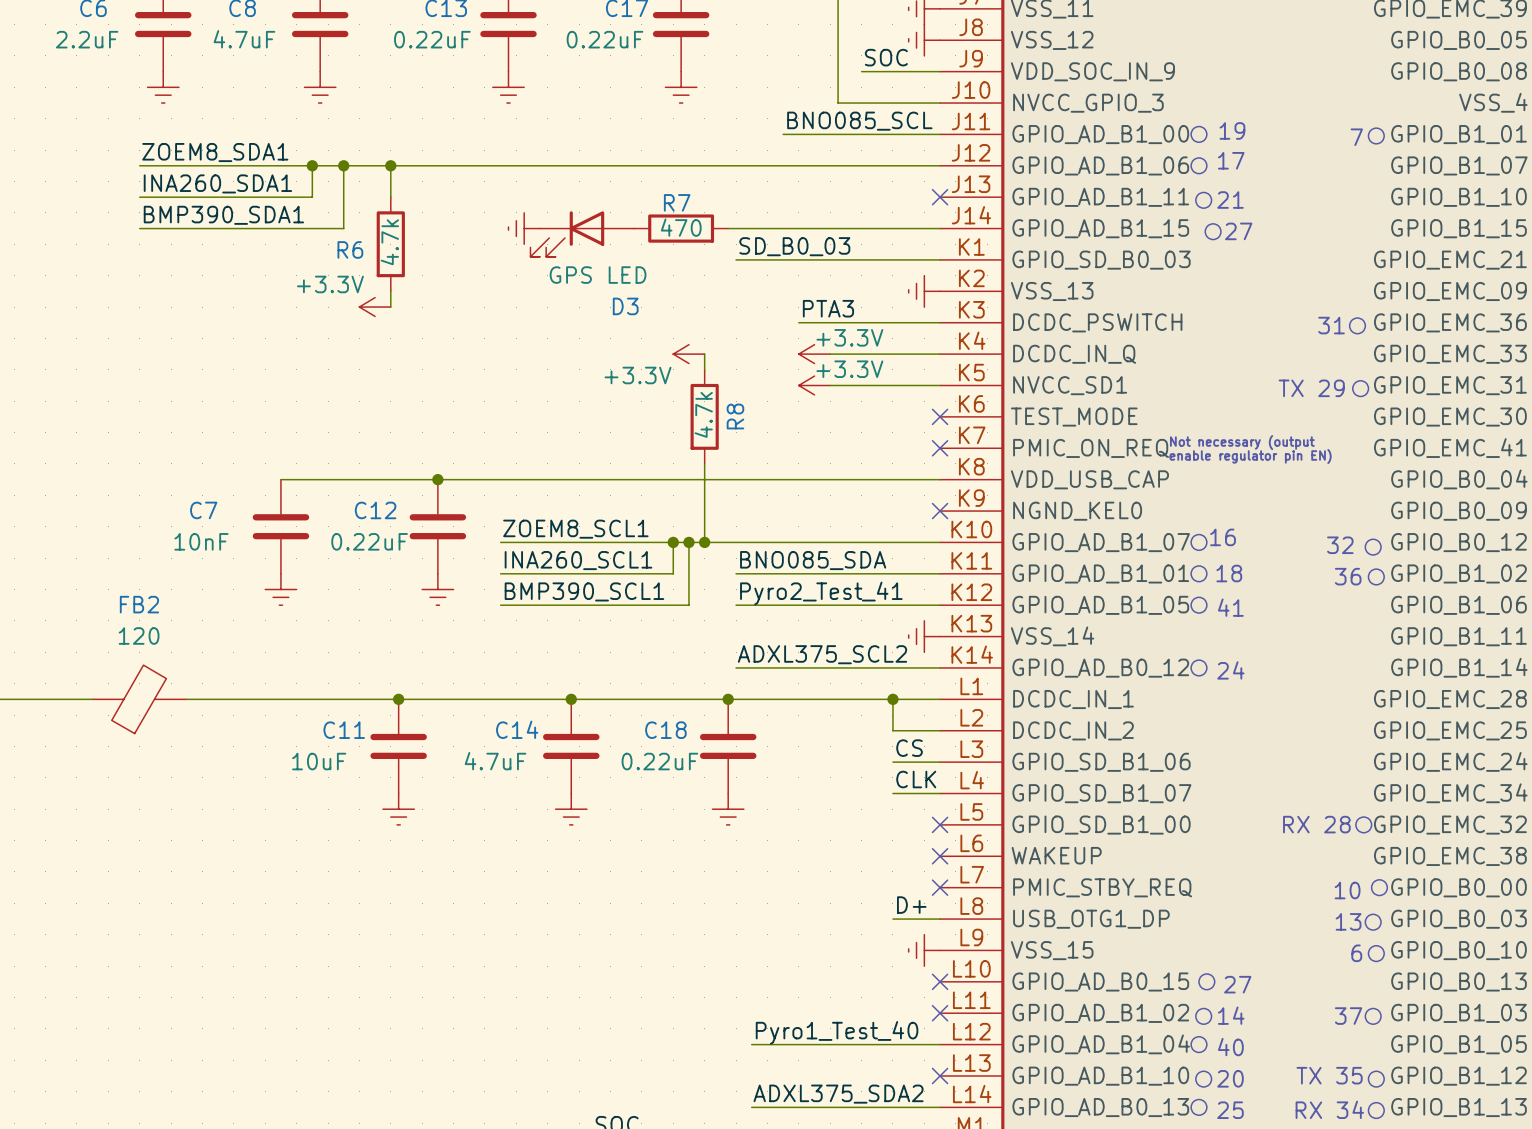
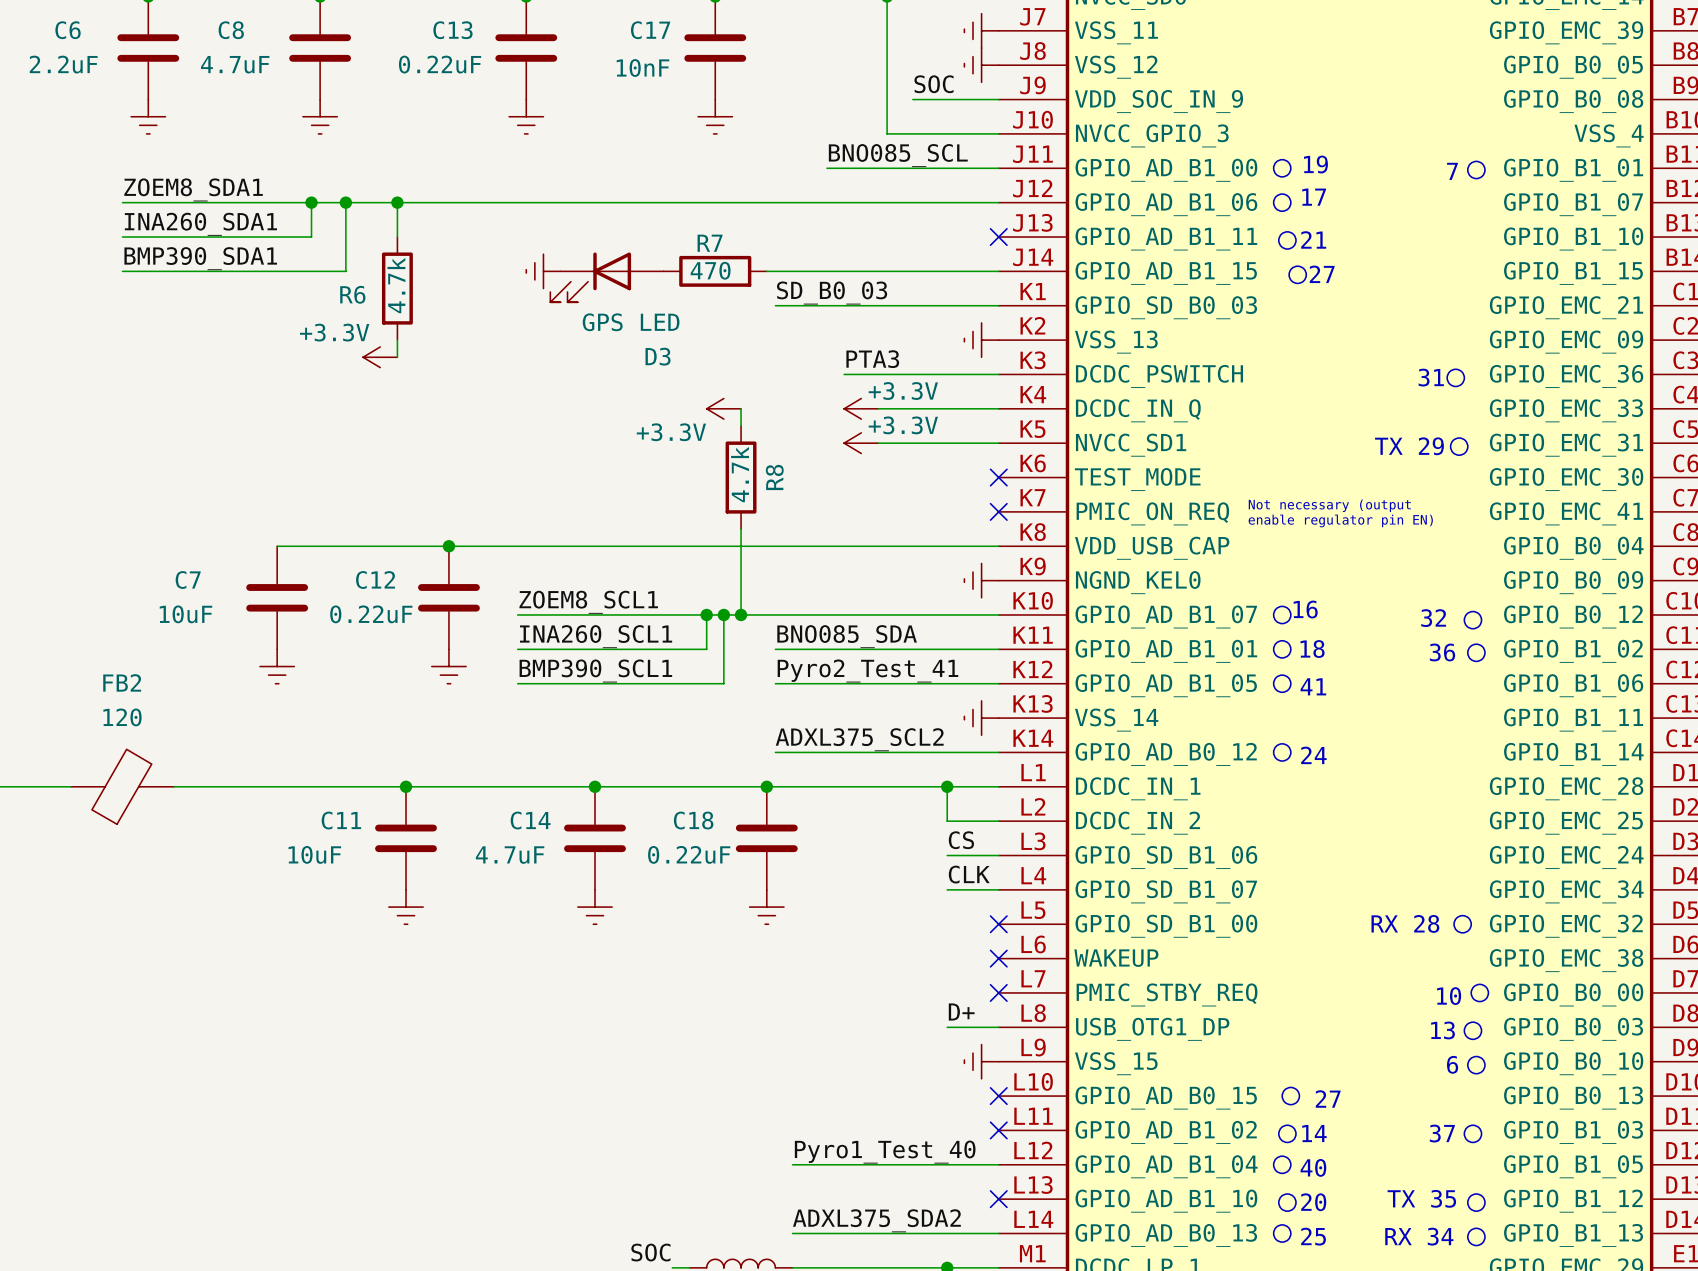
C17 value: 0.22uF (605, 39) -> 10nF (642, 68)
power symbol: none -> (981, 580)
no-connect mark: (940, 511) -> none
C7 value: 10nF (201, 541) -> 10uF (185, 614)

